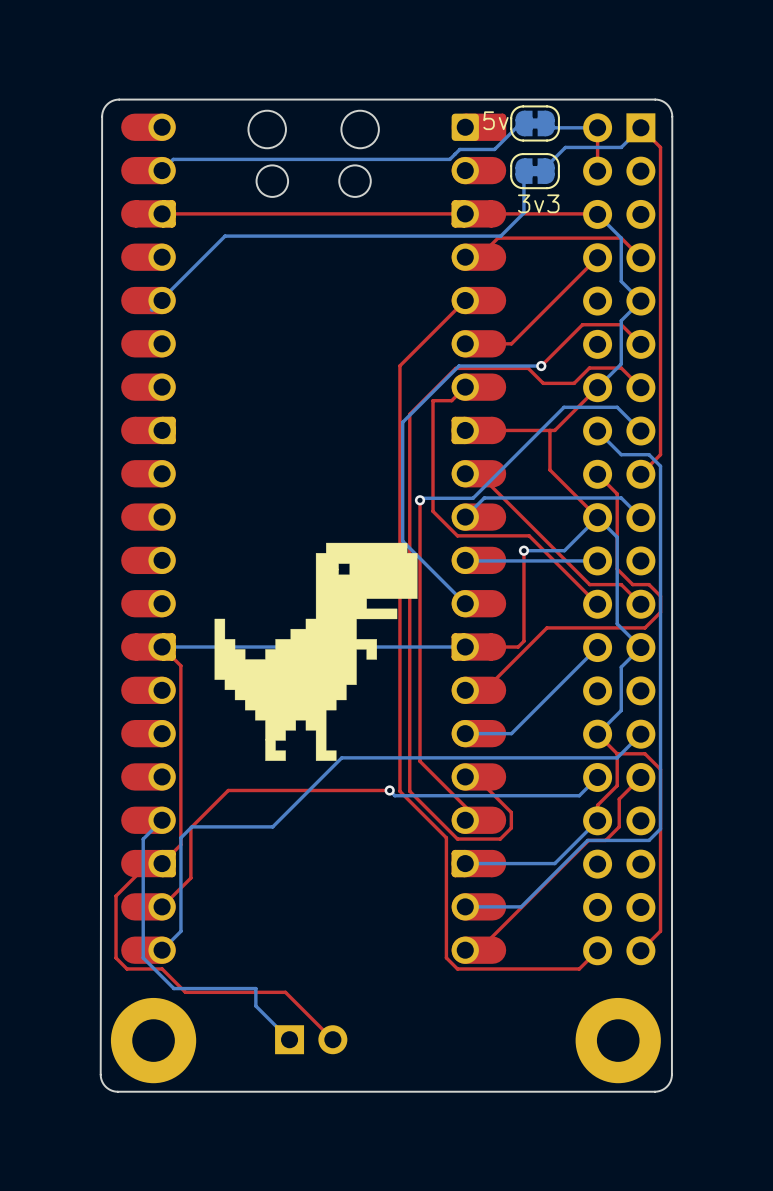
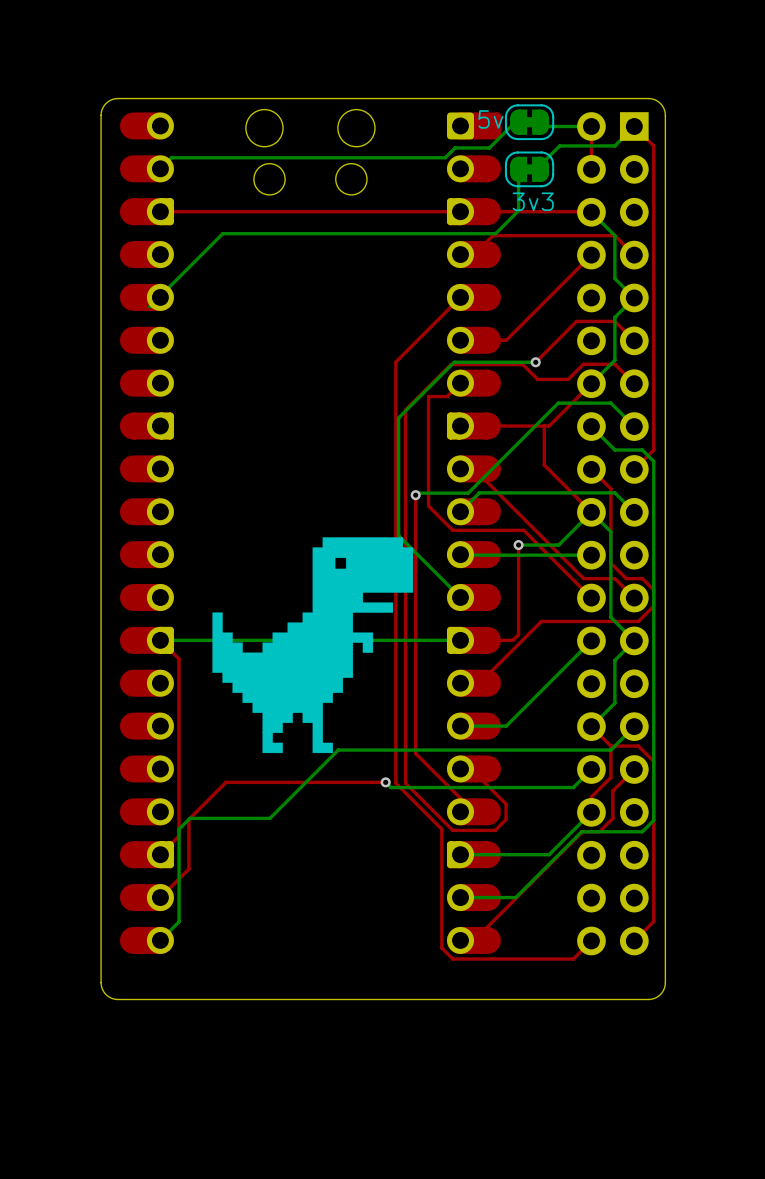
board edge: (672, 116) (671, 1074) (666, 1086) (654, 1091) (117, 1091) (108, 1089) (103, 1083) (100, 1074) (102, 116) -> (665, 115) (665, 982) (660, 994) (648, 999) (117, 999) (108, 996) (103, 991) (101, 982) (101, 115)
bottom track: (162, 820) (143, 839) (143, 957) (173, 988) (255, 988) (255, 1006) (289, 1039) -> none
top track: (148, 863) (116, 895) (116, 957) (127, 968) (162, 968) (185, 992) (285, 992) (332, 1039) -> none
part: (311, 1039) -> none
part: (153, 1040) -> none
part: (618, 1040) -> none

